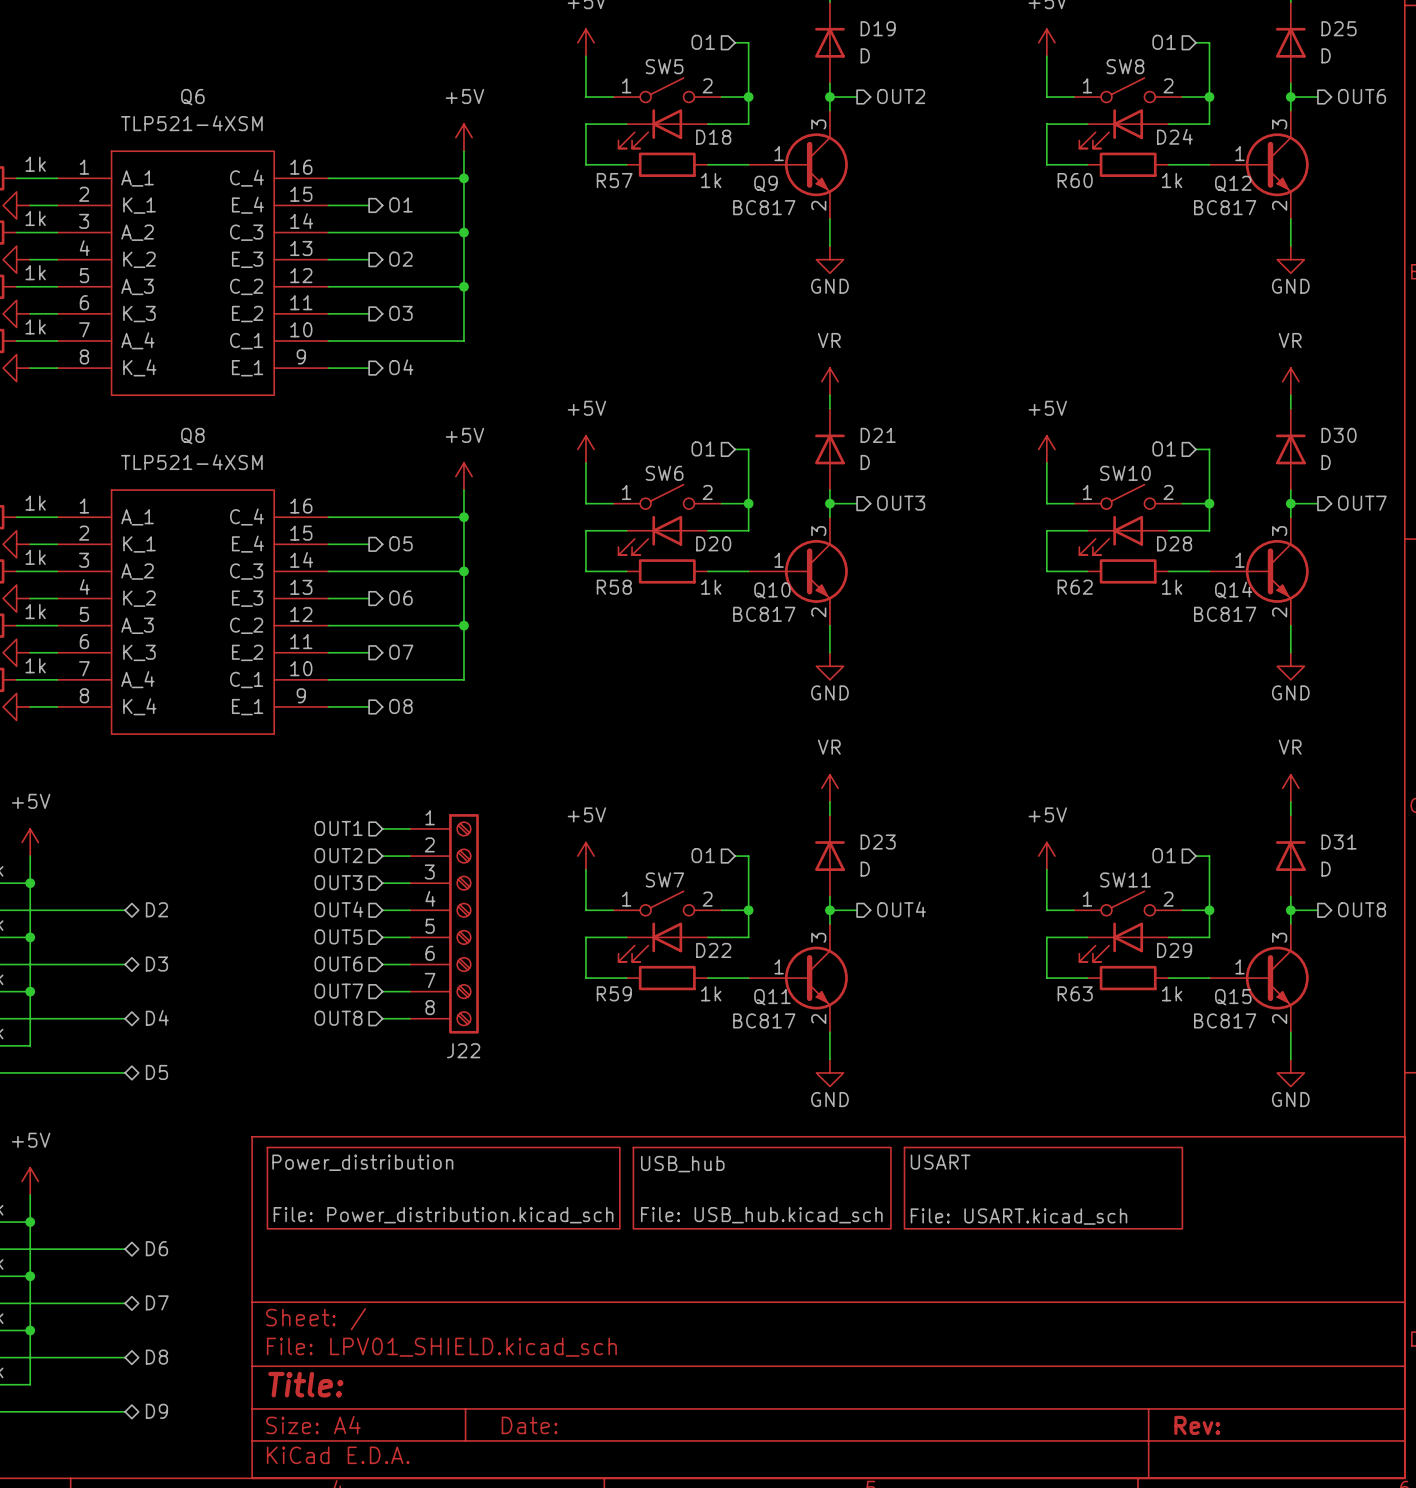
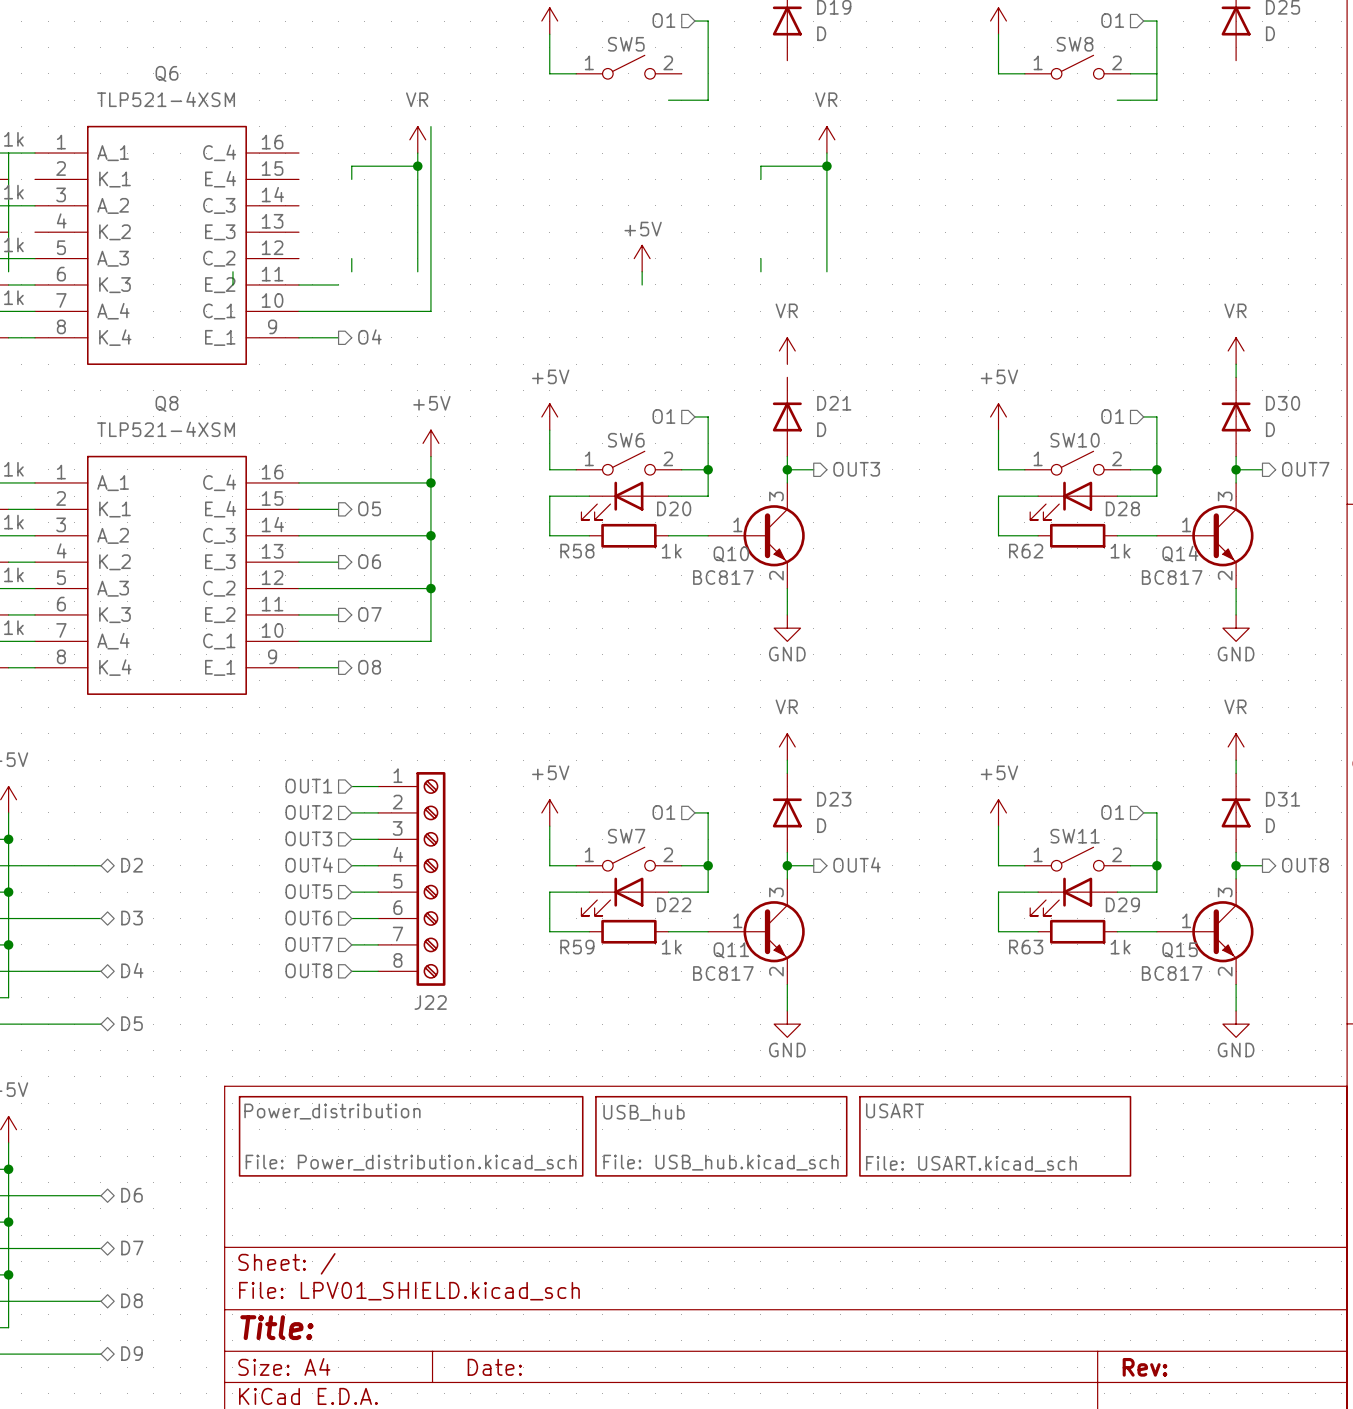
wire: (829, 83) (829, 110) -> none
wire: (1290, 83) (1290, 110) -> none
hierarchical label: OUT2 (901, 96) -> none
hierarchical label: OUT6 (1362, 96) -> none
wire: (721, 97) (748, 97) -> none
junction: (748, 97) -> none
wire: (829, 97) (857, 97) -> none
junction: (829, 97) -> none
junction: (1209, 97) -> none
wire: (1290, 97) (1317, 97) -> none
junction: (1290, 97) -> none
wire: (626, 124) (585, 124) (585, 164) (626, 164) -> none
wire: (1087, 124) (1046, 124) (1046, 164) (1087, 164) -> none
D18: (663, 128) -> none
D24: (1124, 128) -> none
power symbol: +5V (463, 137) -> none
power symbol: none -> VR (417, 139)
R57: 1k (667, 164) -> none
wire: (707, 164) (748, 164) -> none
Q9: BC817 (798, 164) -> none
power symbol: none -> VR (826, 139)
R60: 1k (1128, 164) -> none
wire: (1168, 164) (1209, 164) -> none
Q12: BC817 (1259, 164) -> none
wire: none -> (8, 153) (8, 271)
wire: (328, 178) (463, 178) -> none
wire: none -> (417, 153) (417, 271)
junction position: (463, 178) -> (417, 166)
wire: none -> (826, 153) (826, 271)
wire: none -> (417, 166) (351, 166) (351, 179)
wire: none -> (826, 166) (760, 166) (760, 179)
junction: none -> (826, 166)
hierarchical label: O1 (400, 204) -> none
wire: (30, 205) (57, 205) -> none
wire: (328, 205) (369, 205) -> none
wire: (829, 219) (829, 246) -> none
wire: (1290, 219) (1290, 246) -> none
wire: (328, 232) (463, 232) -> none
junction: (463, 232) -> none
wire: (30, 259) (57, 259) -> none
wire: (328, 259) (369, 259) -> none
hierarchical label: O2 (400, 259) -> none
power symbol: GND (829, 259) -> none
power symbol: GND (1290, 259) -> none
wire: (328, 286) (463, 286) -> none
wire: none -> (351, 258) (351, 271)
junction: (463, 286) -> none
power symbol: none -> +5V (642, 258)
wire: none -> (232, 271) (232, 284)
wire: none -> (642, 271) (642, 284)
hierarchical label: O3 (400, 313) -> none
wire: (829, 395) (829, 408) -> (760, 258) (760, 271)

